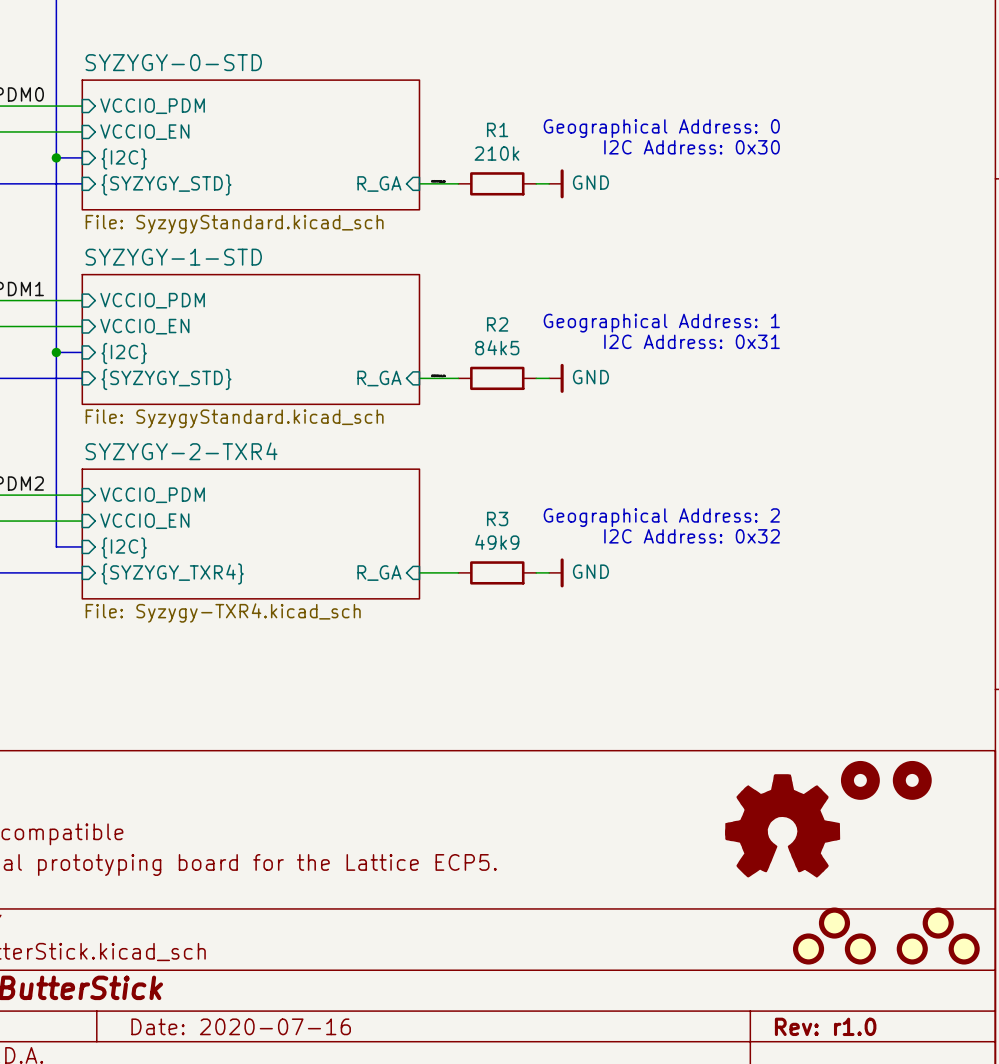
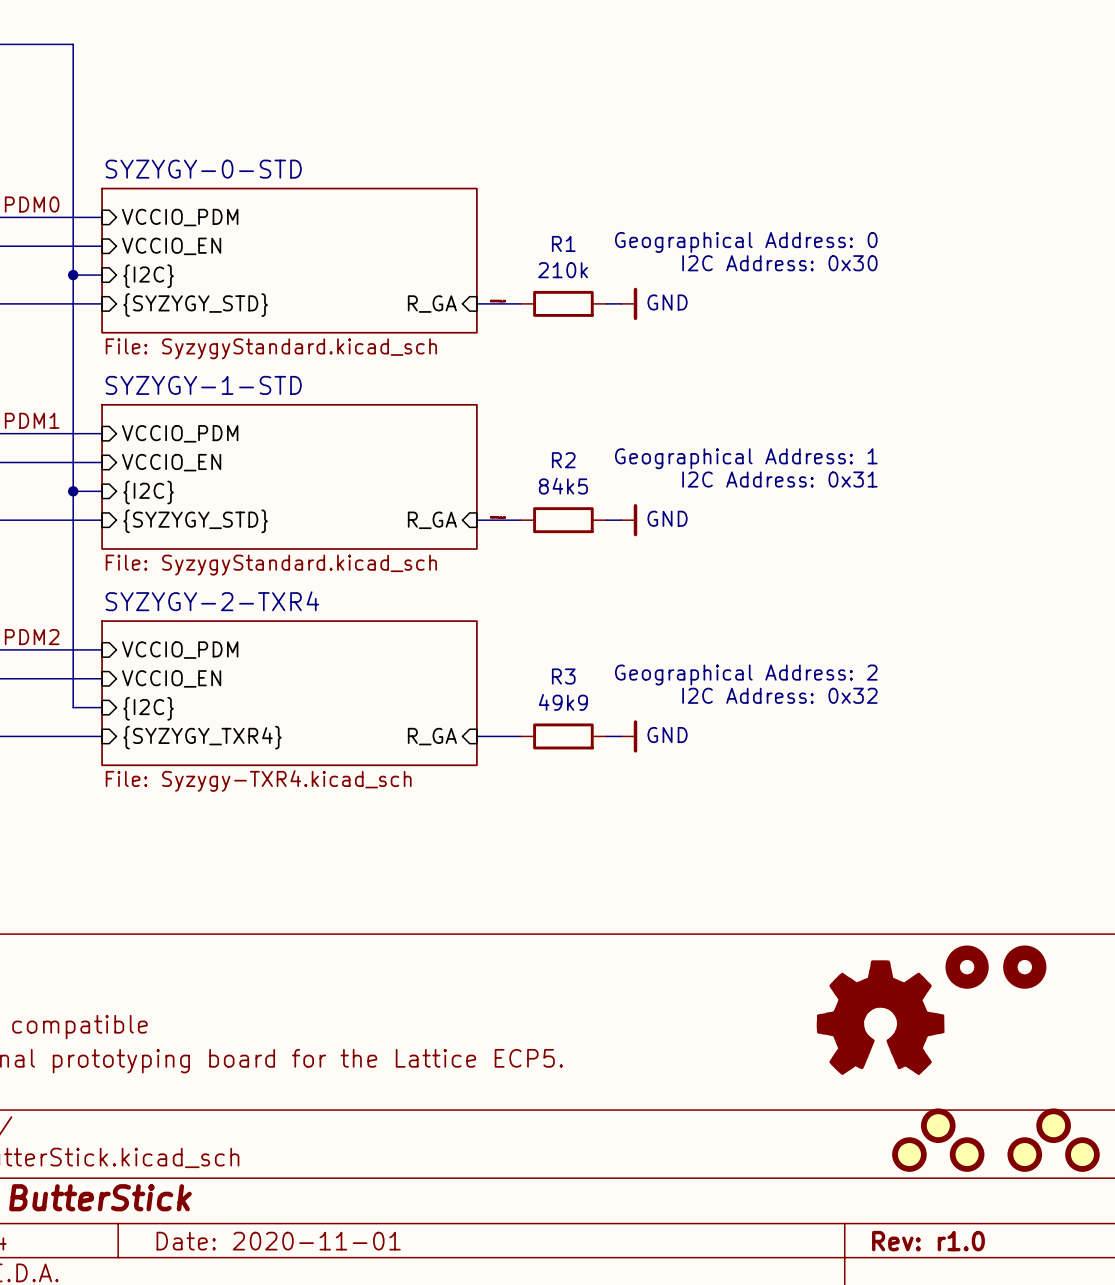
title block: Date: 2020-07-16 (241, 1026) -> Date: 2020-11-01 (278, 1241)

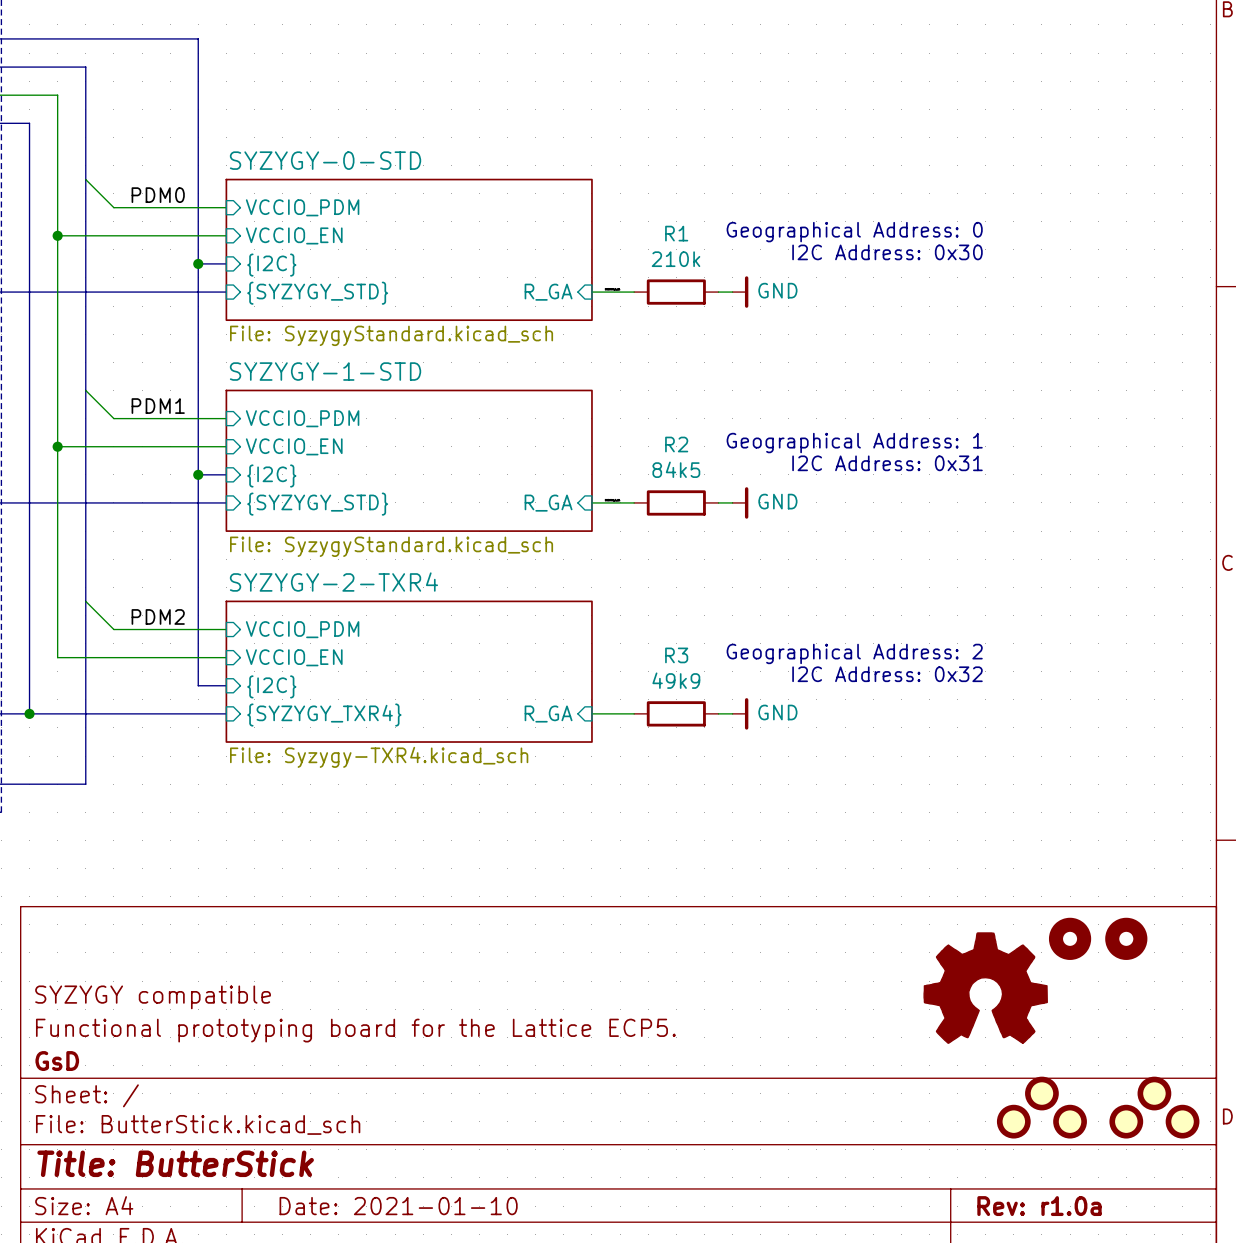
title block: Date: 2020-11-01 (278, 1241) -> Date: 2021-01-10 (398, 1206)
title block: Rev: r1.0 (928, 1241) -> Rev: r1.0a (1039, 1206)

